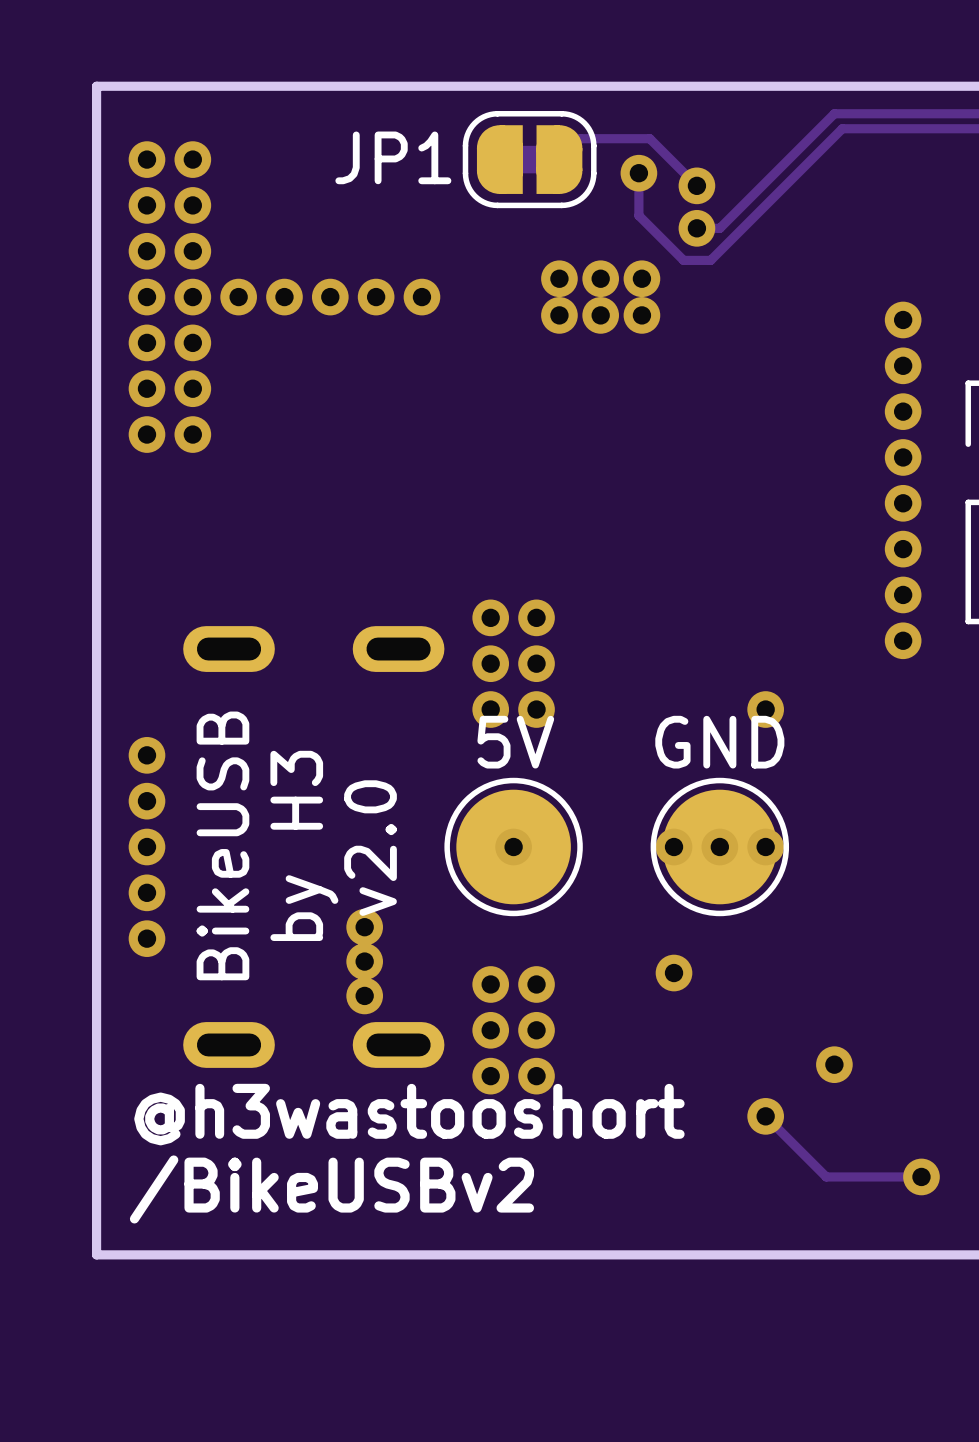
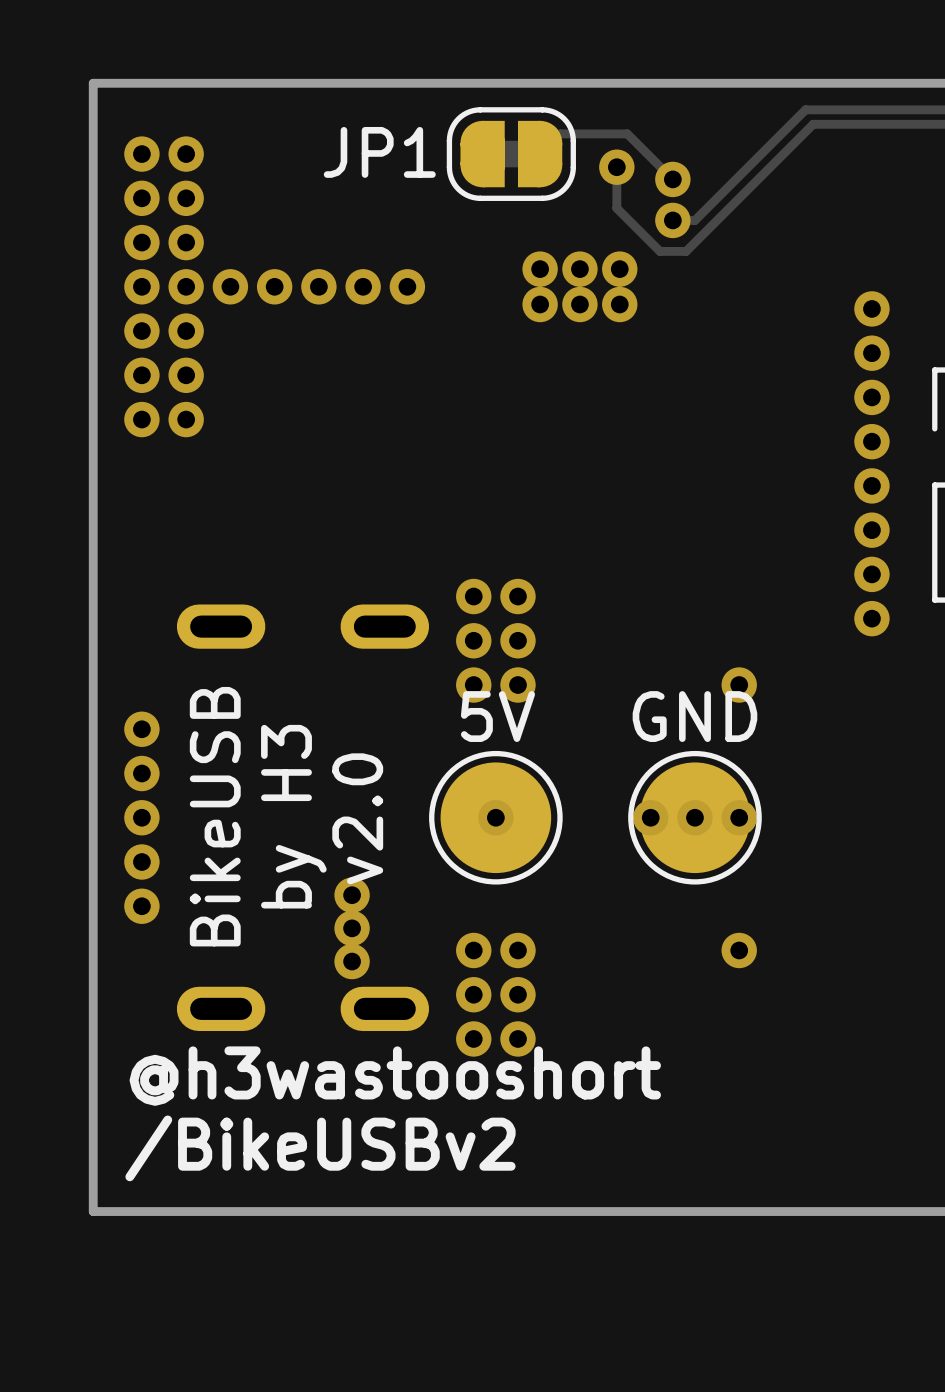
via: (674, 973) -> none
via: none -> (739, 950)
via: (834, 1064) -> none
track: (765, 1116) (826, 1176) (921, 1176) -> none
via: (765, 1116) -> none
via: (921, 1176) -> none

